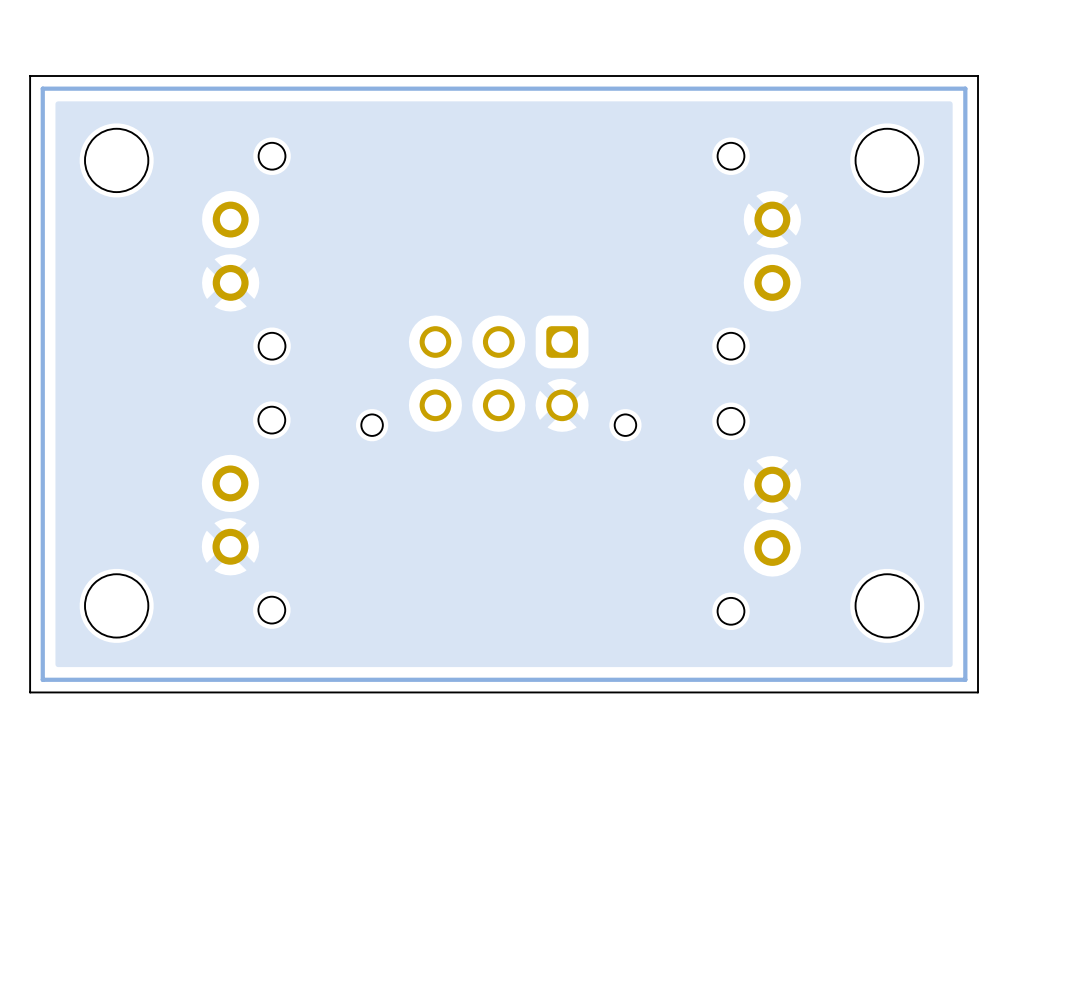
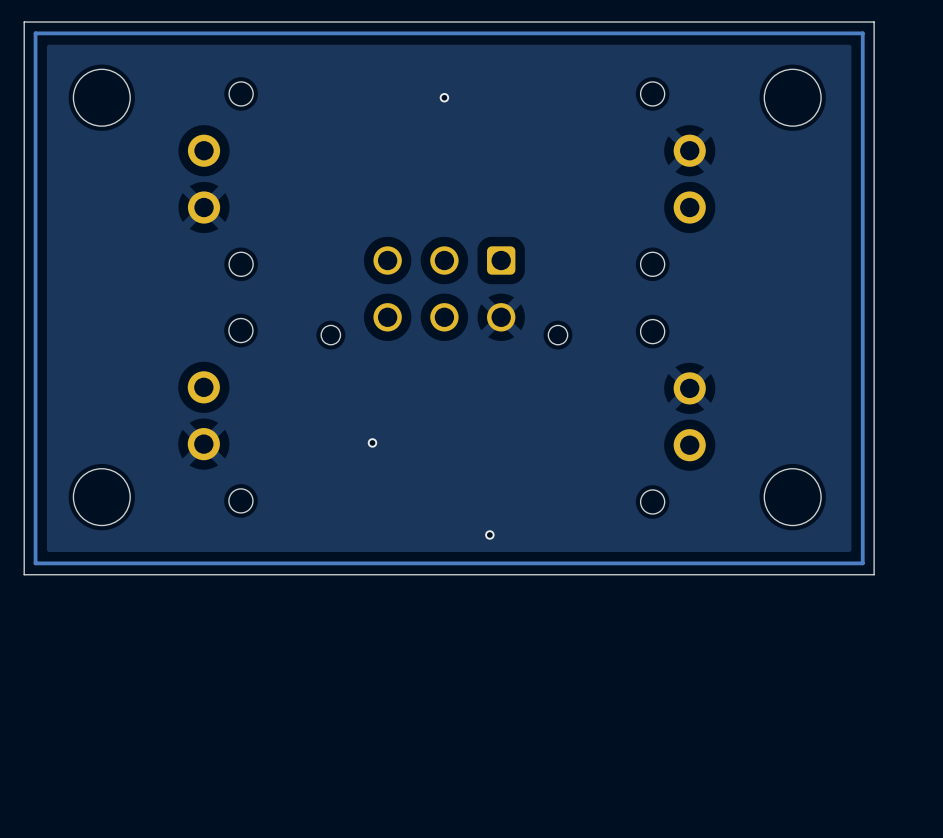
via: none -> (444, 97)
via: none -> (372, 442)
via: none -> (489, 534)

